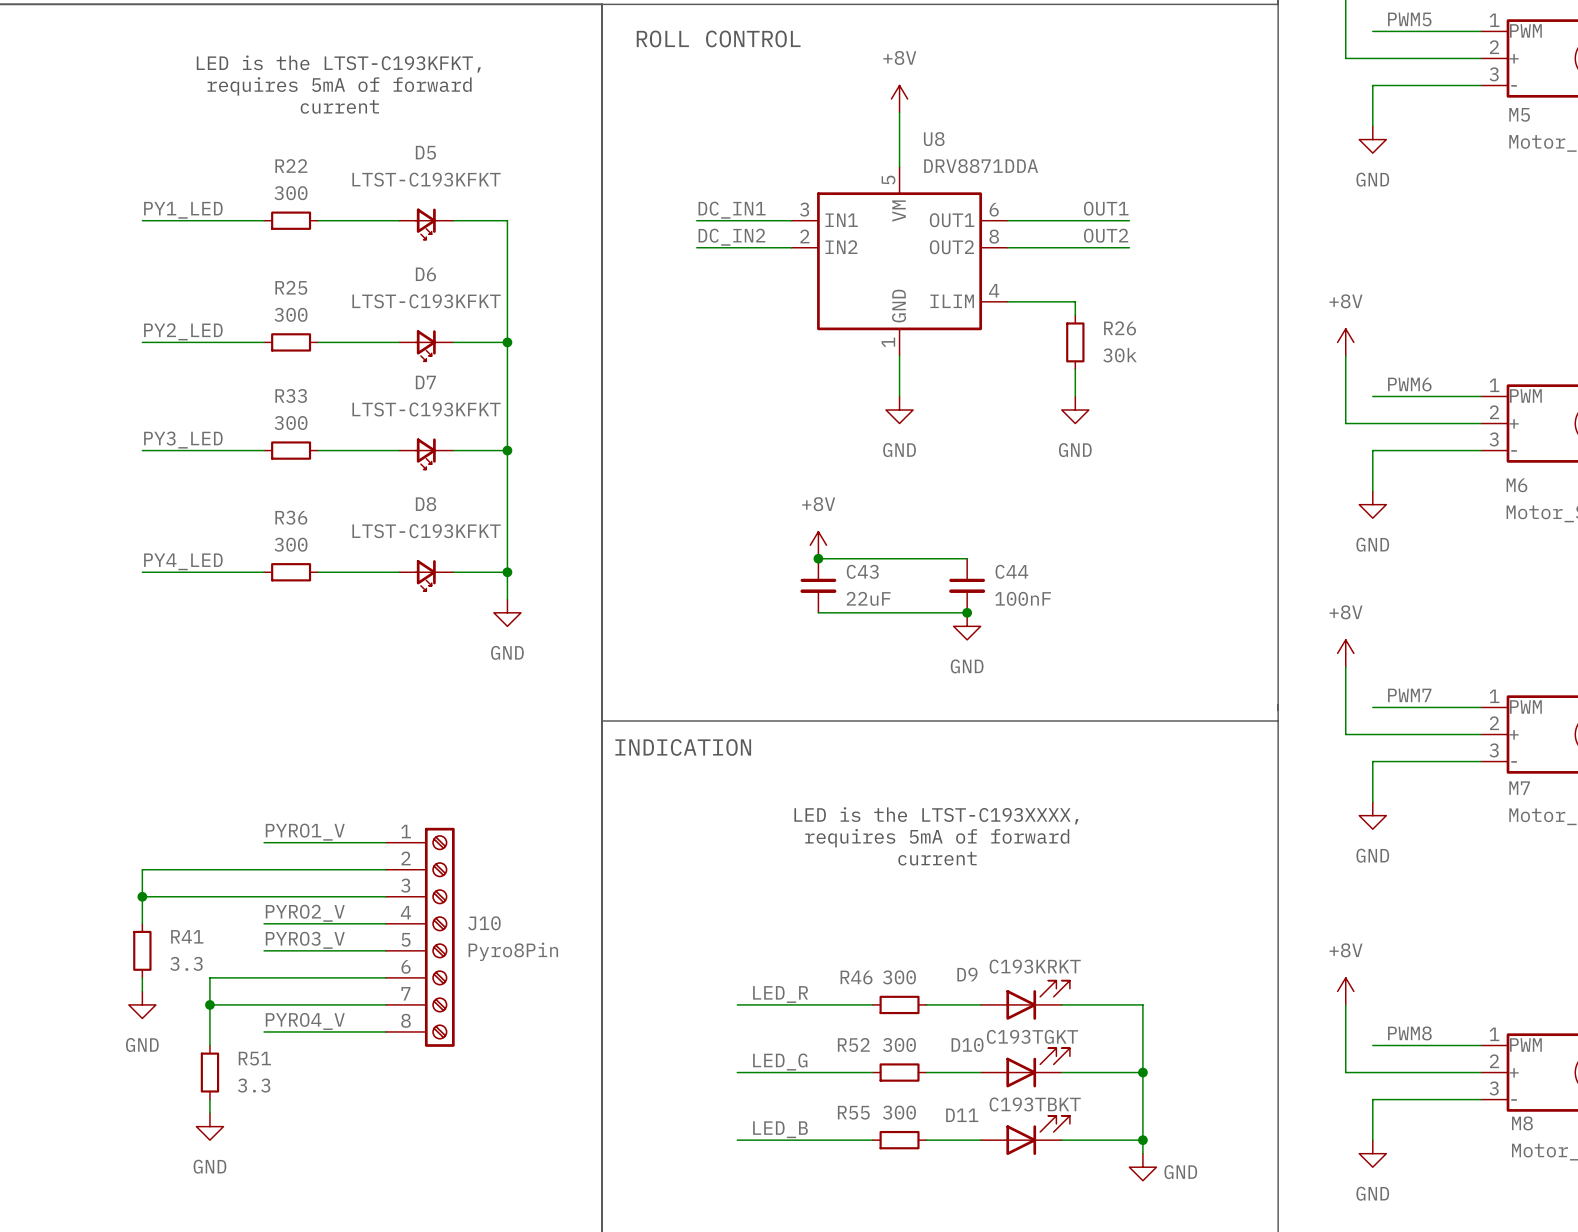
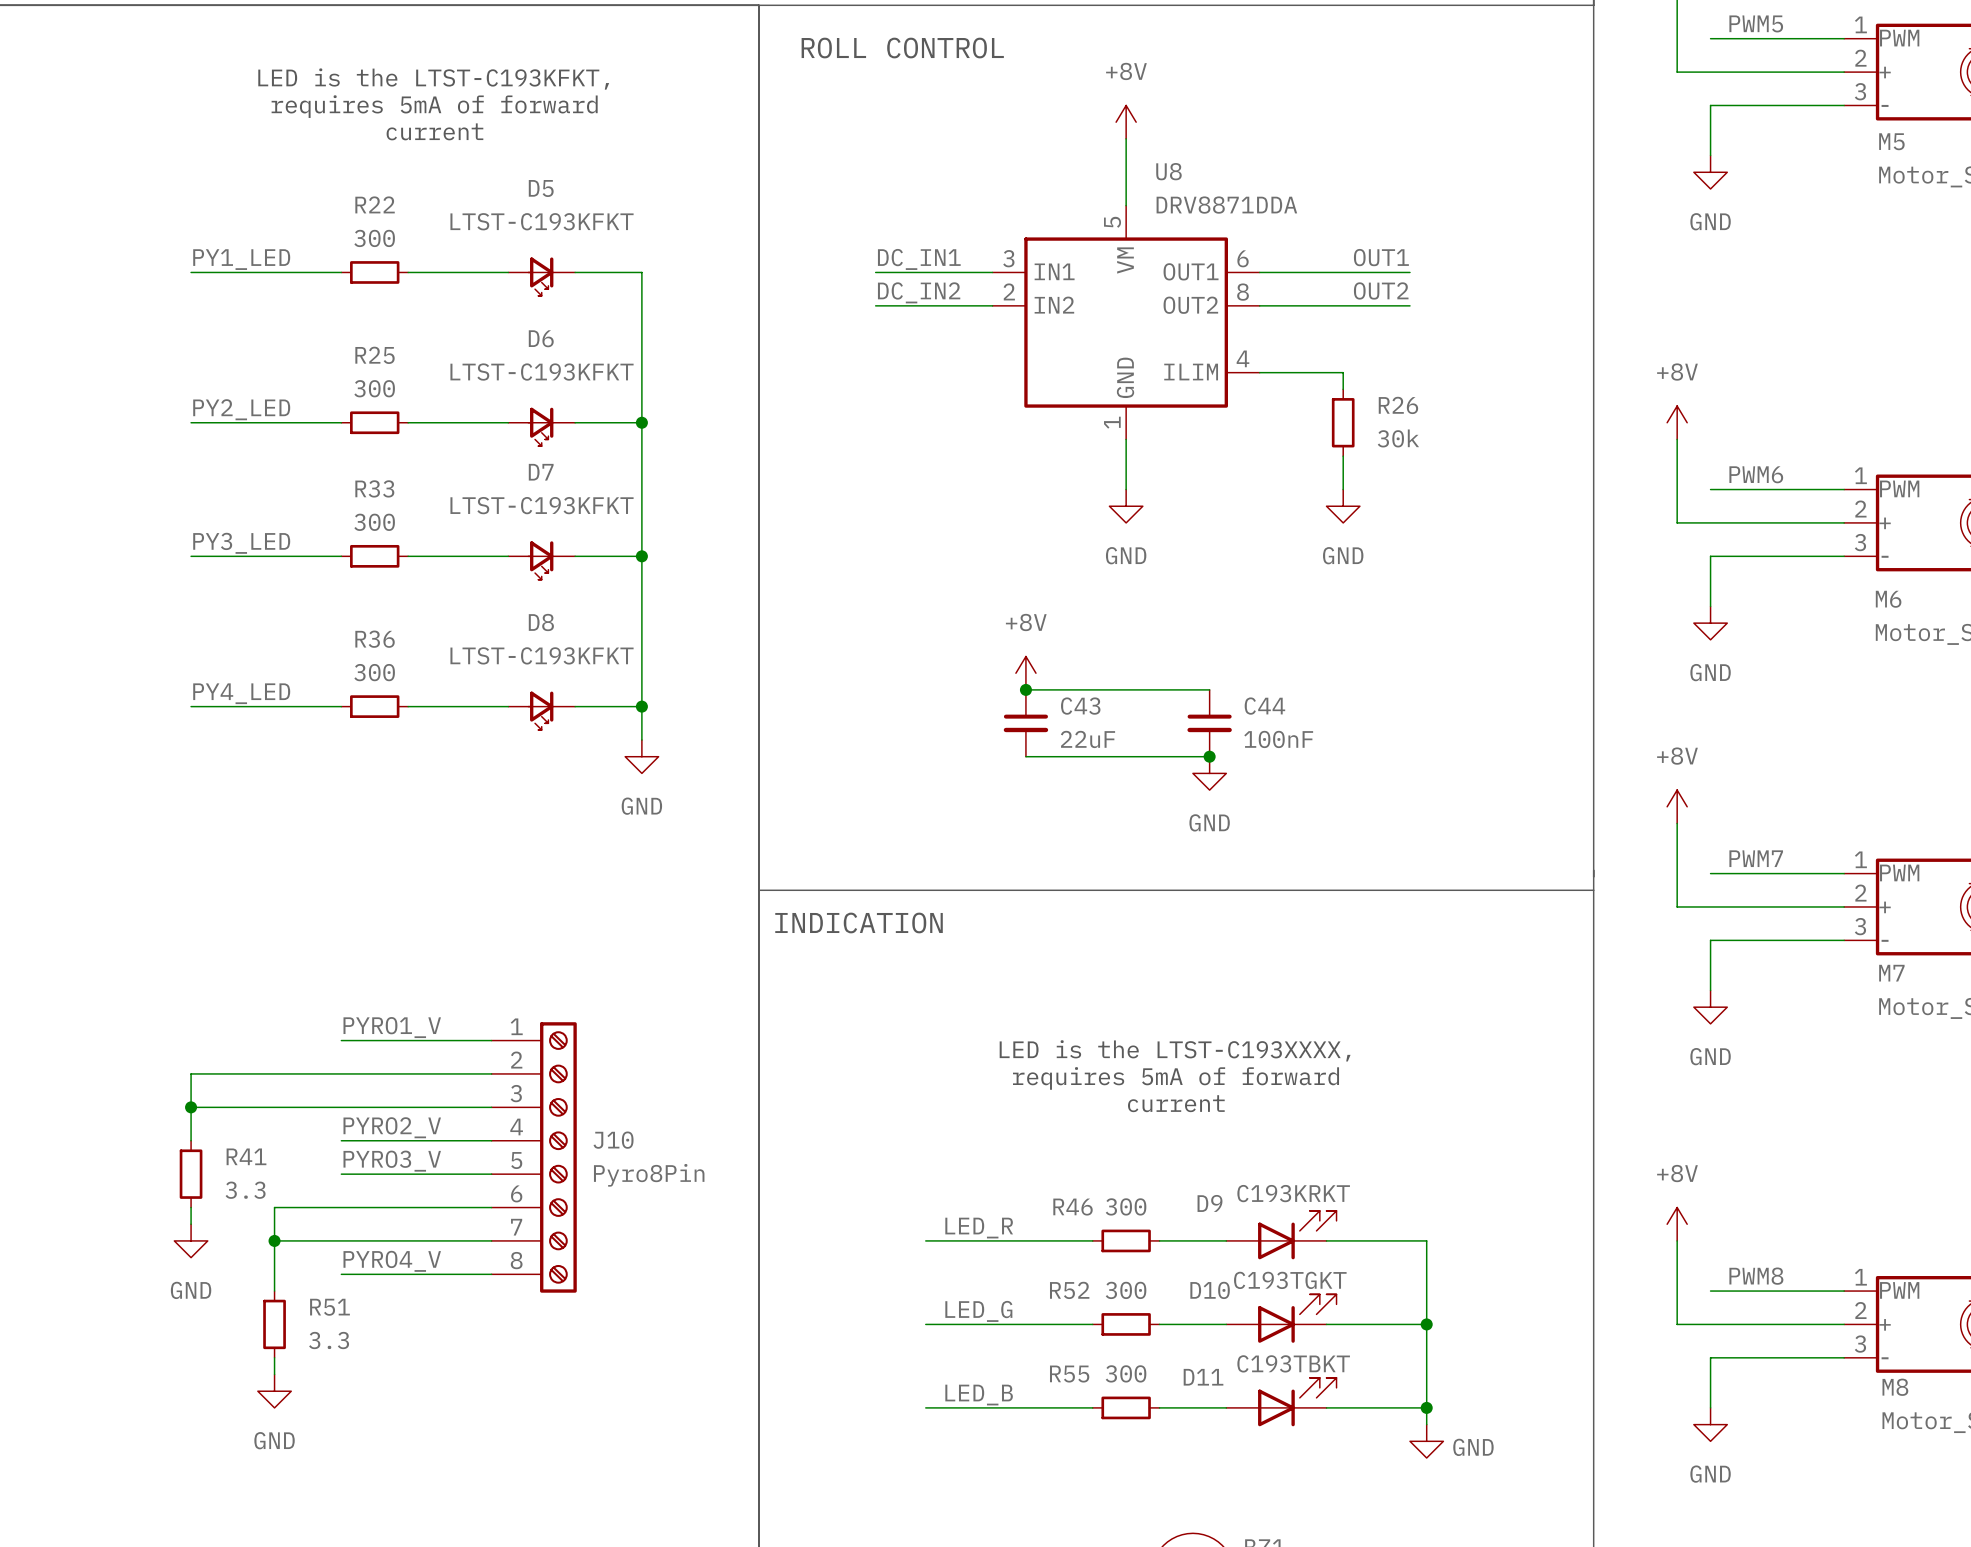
text position: LED is the LTST-C193XXXX, (936, 815) -> LED is the LTST-C193XXXX, (1175, 1050)
text position: requires 5mA of forward (937, 838) -> requires 5mA of forward (1176, 1078)
text position: current (937, 858) -> current (1176, 1103)

